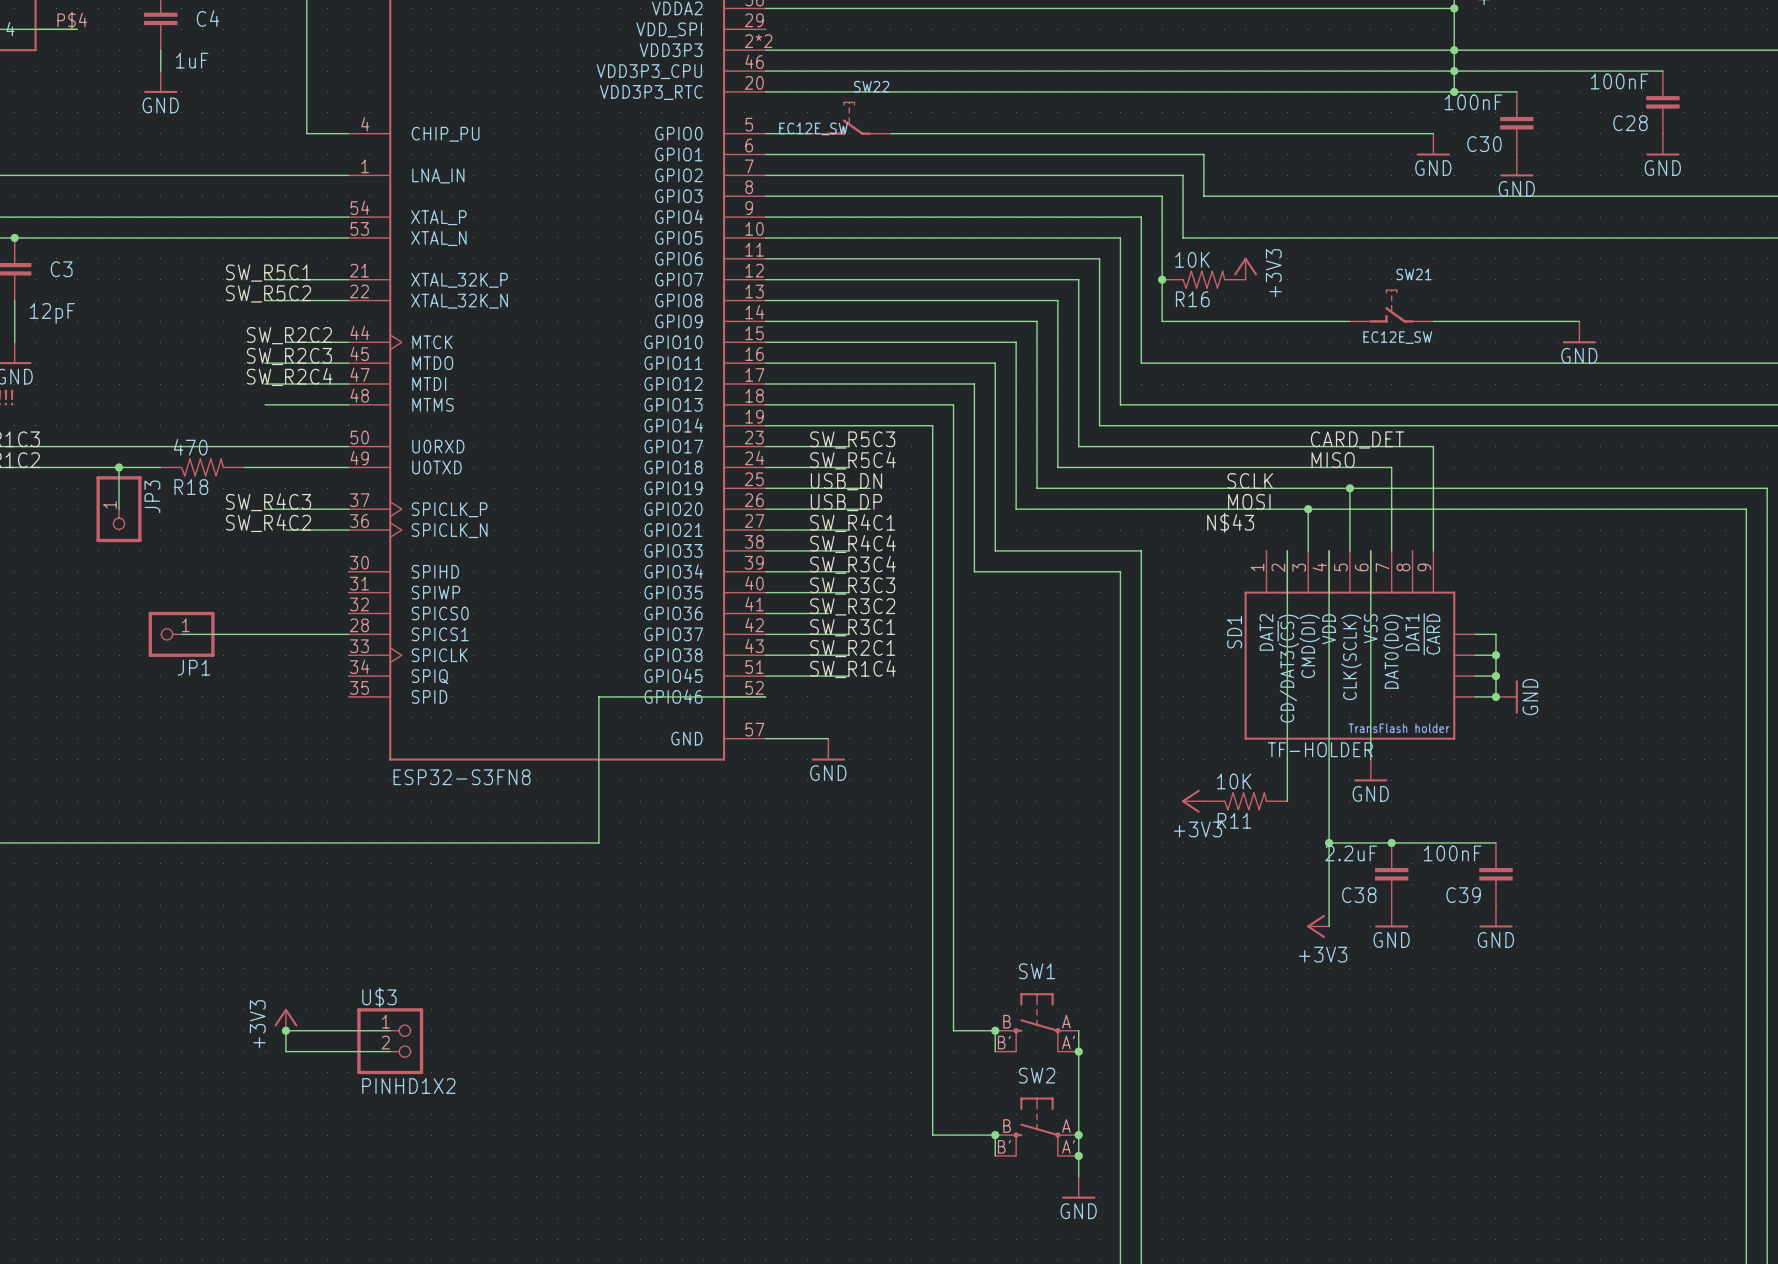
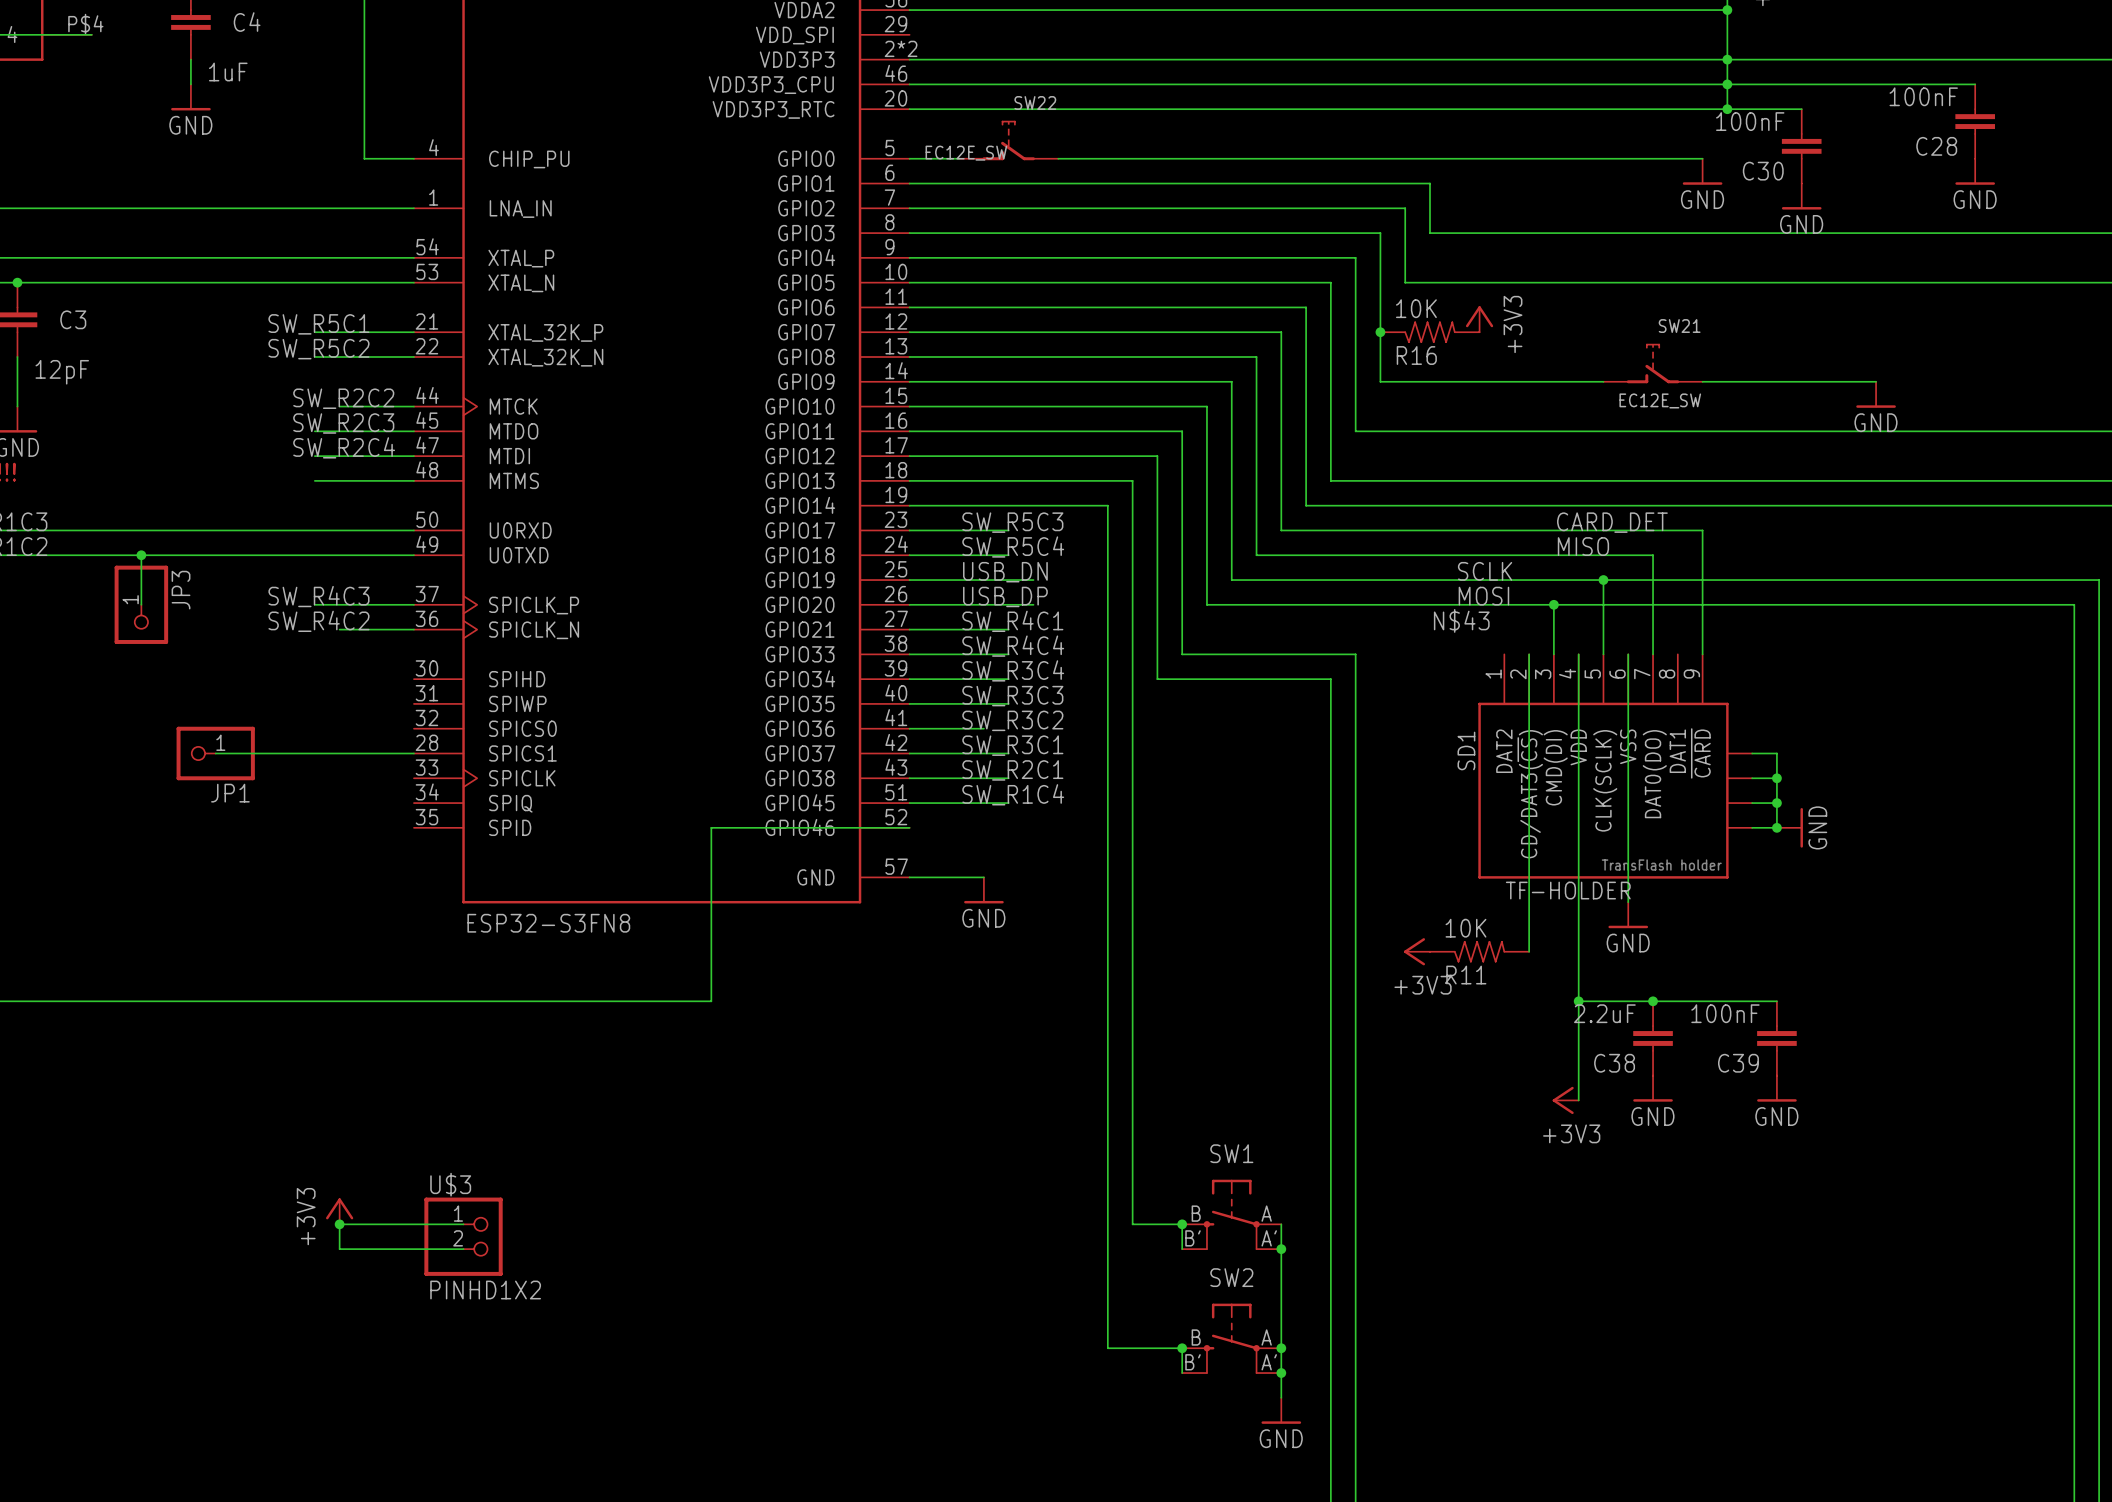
R18: 470 (202, 467) -> none

